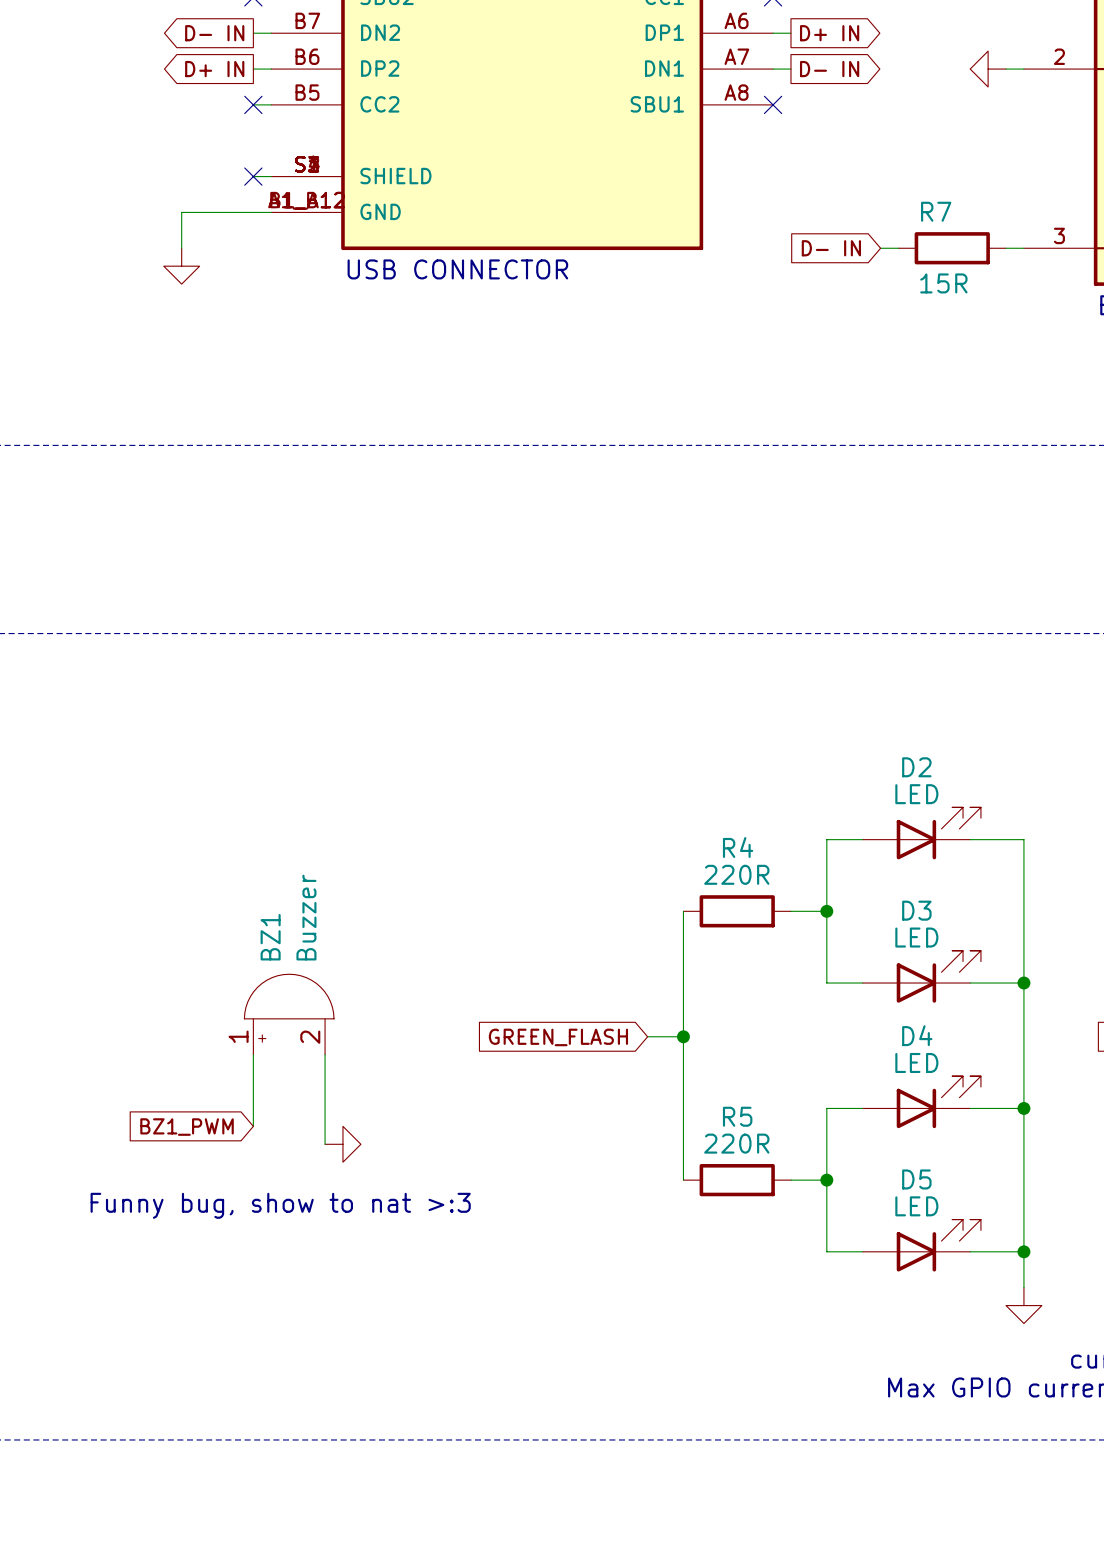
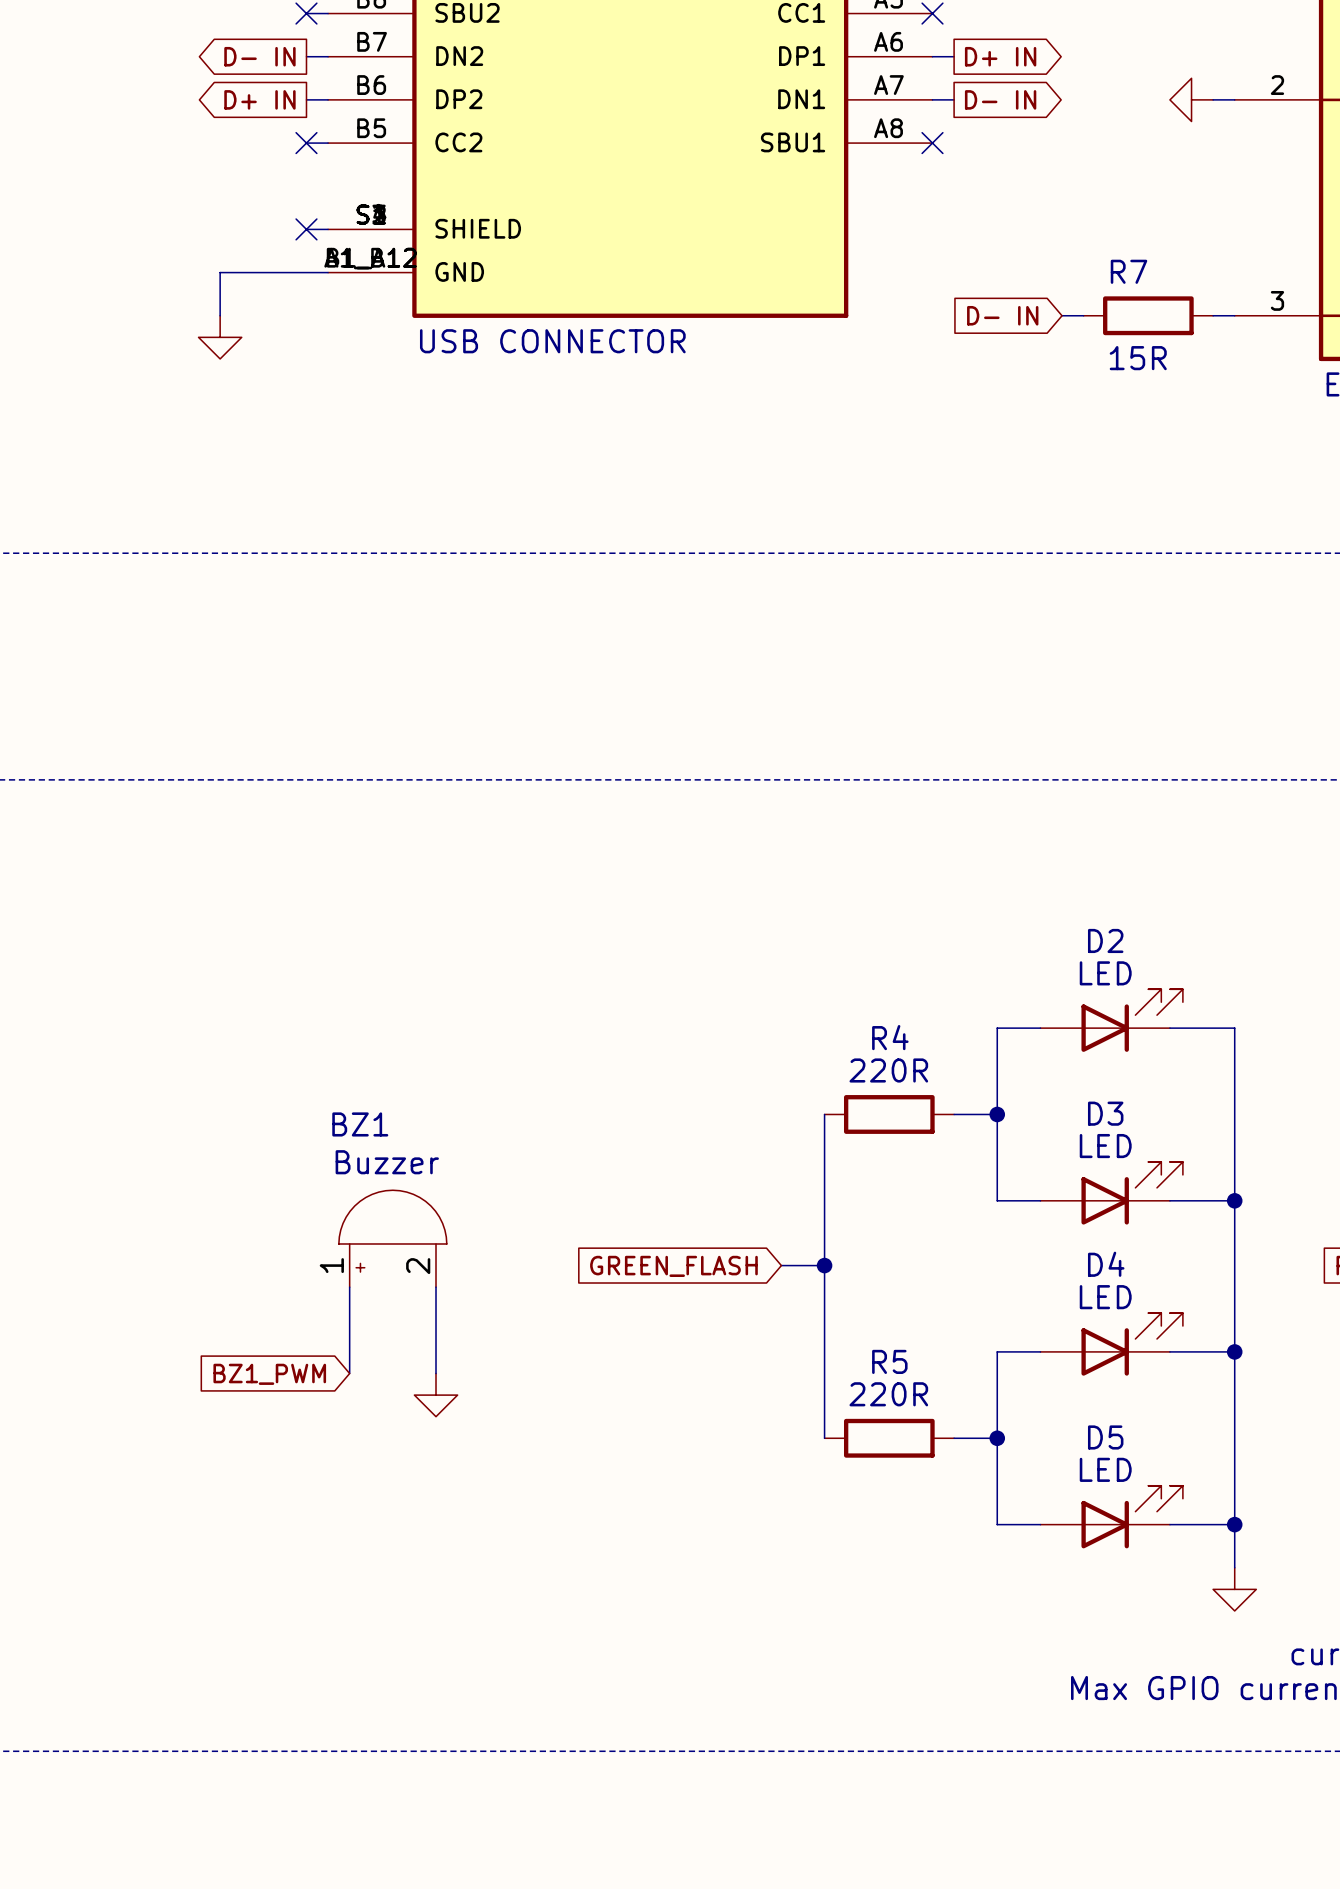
BZ1 value rotation: 0° (306, 917) -> 90° clockwise (387, 1162)
BZ1 name rotation: 0° (270, 937) -> 90° clockwise (360, 1124)
BZ1 position: (289, 1014) -> (392, 1238)
wire: (253, 1054) (253, 1126) -> (349, 1287) (349, 1373)
wire: (325, 1054) (325, 1144) -> none
wire: none -> (436, 1287) (436, 1373)
global label position: BZ1_PWM (187, 1127) -> BZ1_PWM (269, 1374)
power symbol rotation: 0° (342, 1144) -> 90° clockwise (436, 1395)
text: Funny bug, show to nat >:3 (280, 1205) -> none

